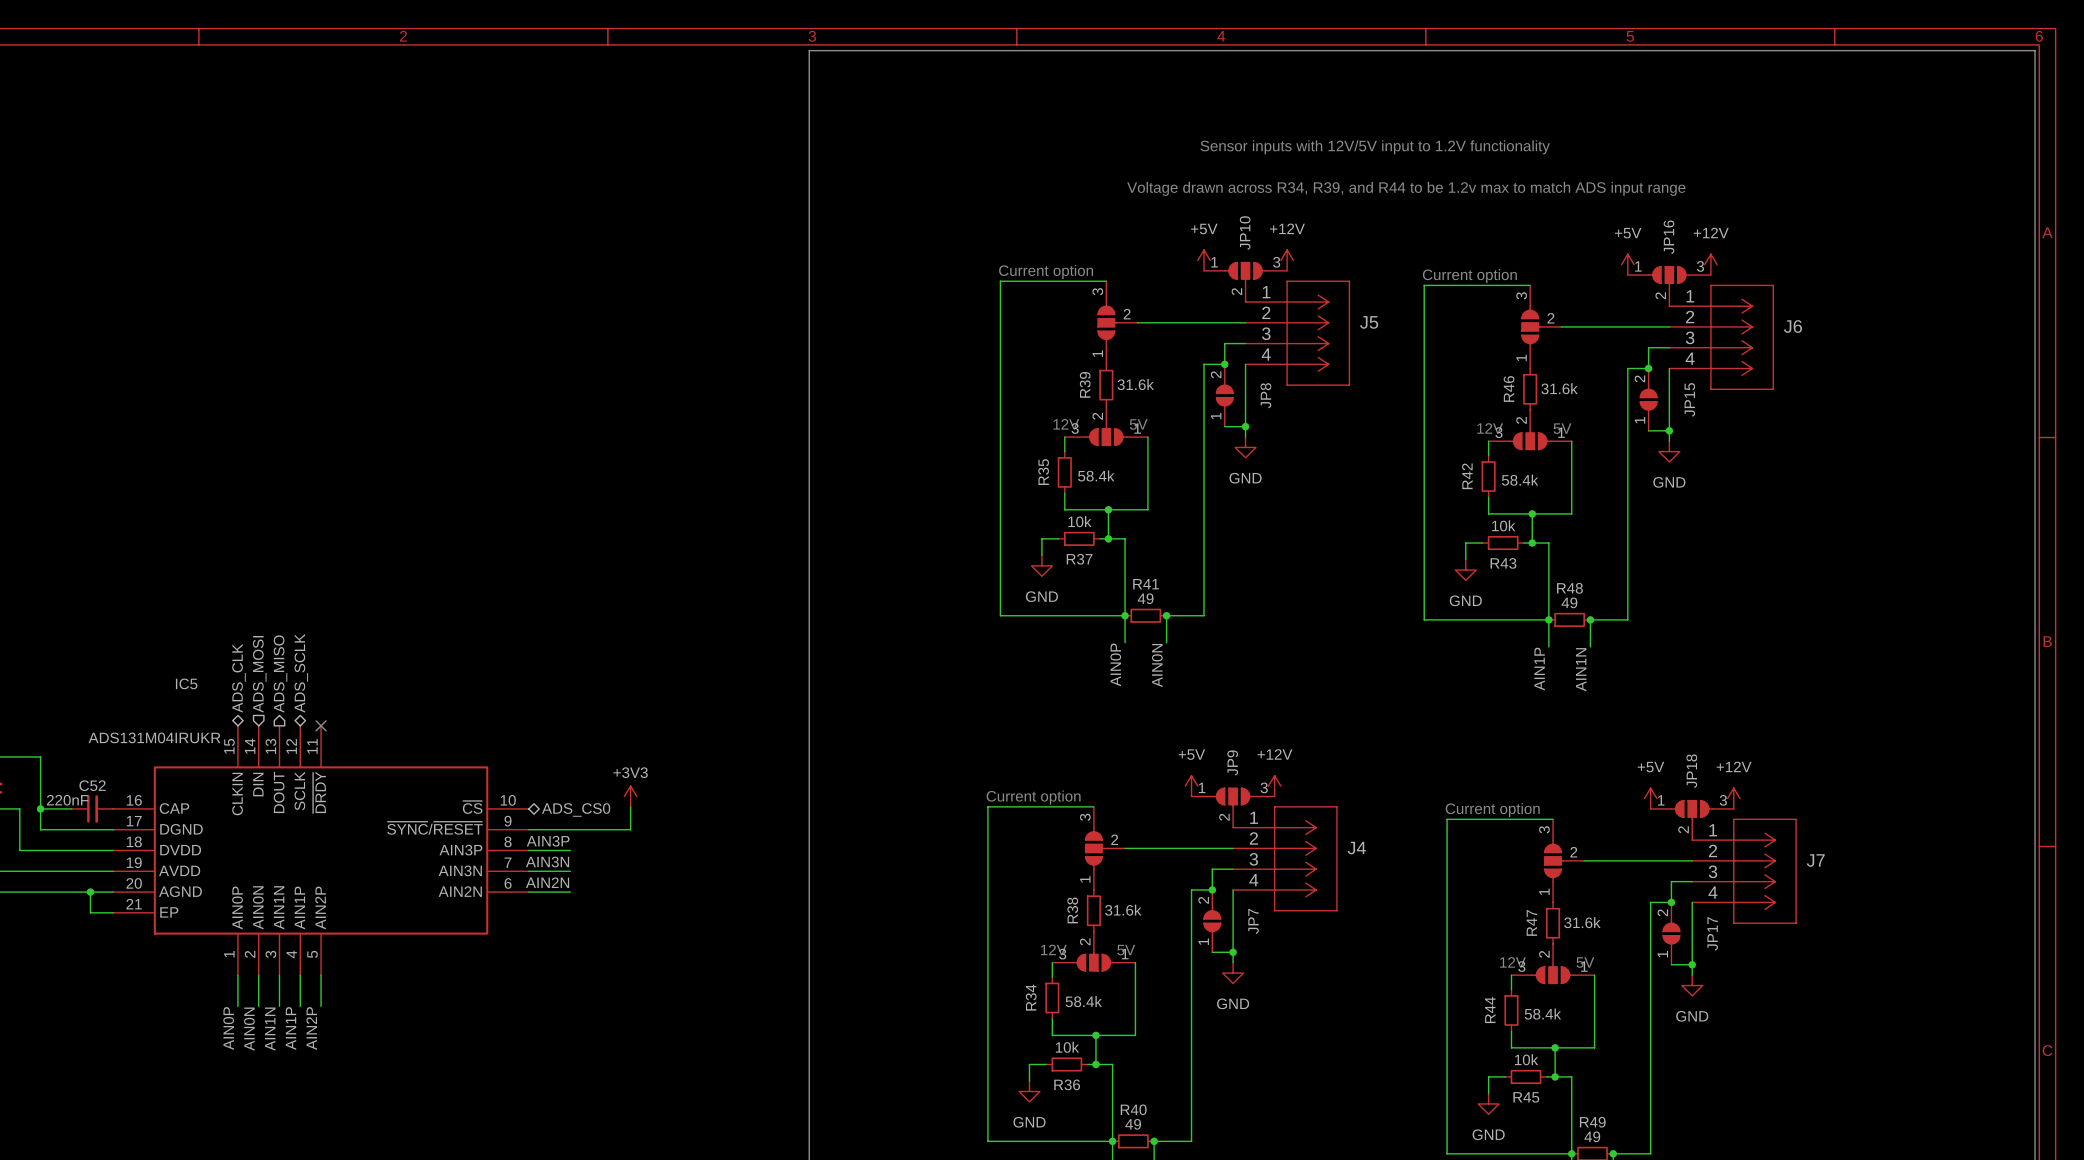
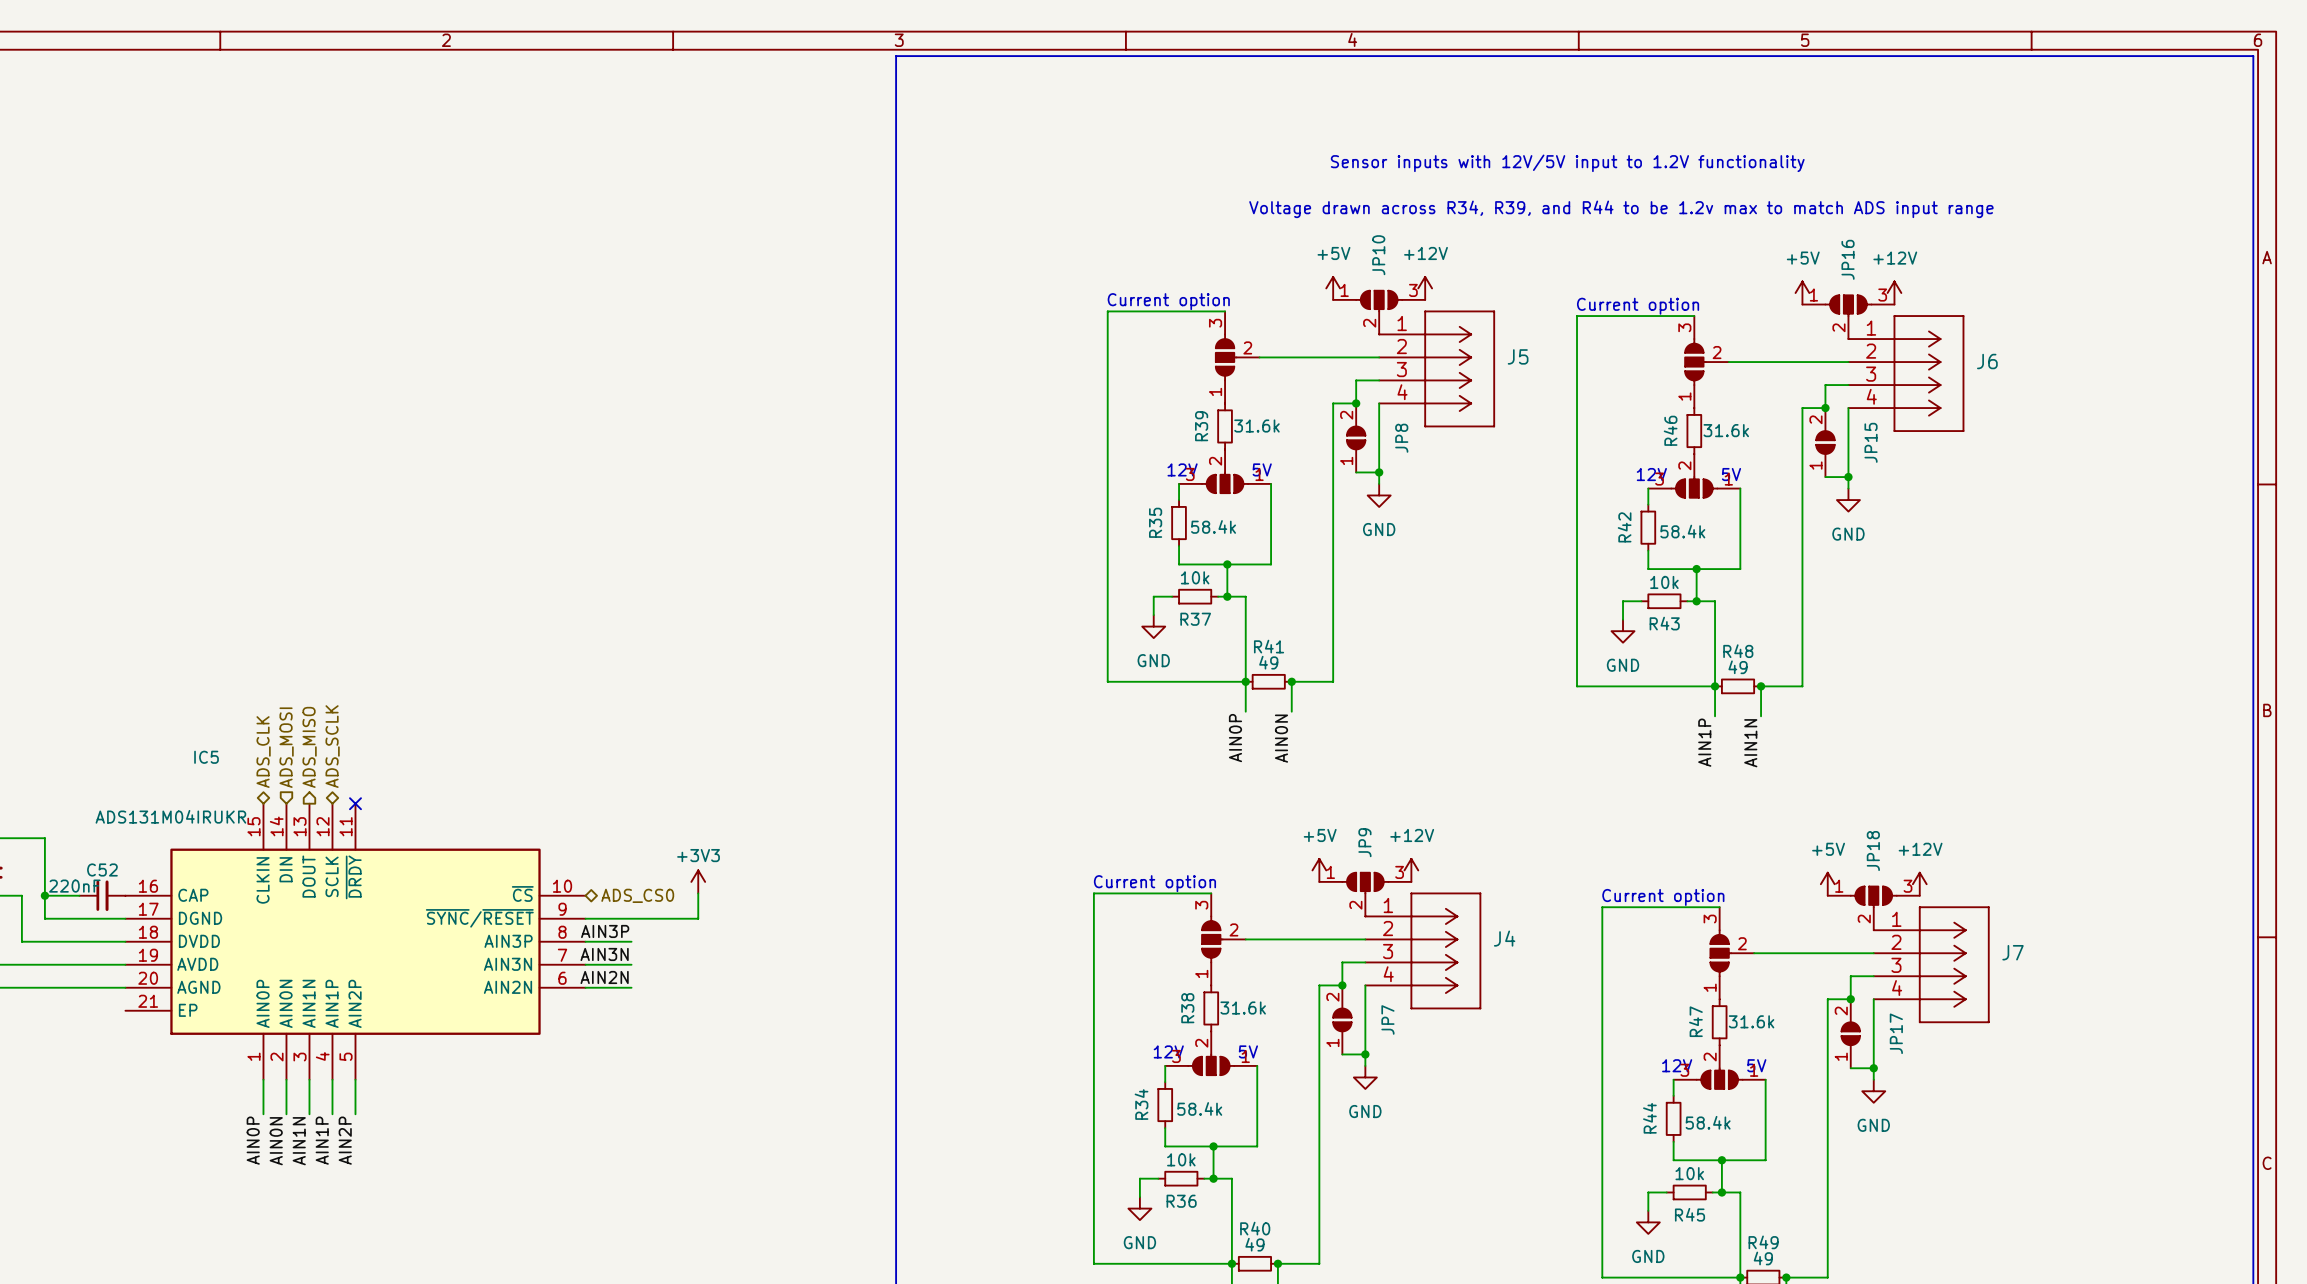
wire: (90, 892) (90, 912) (113, 912) -> none
junction: (90, 892) -> none

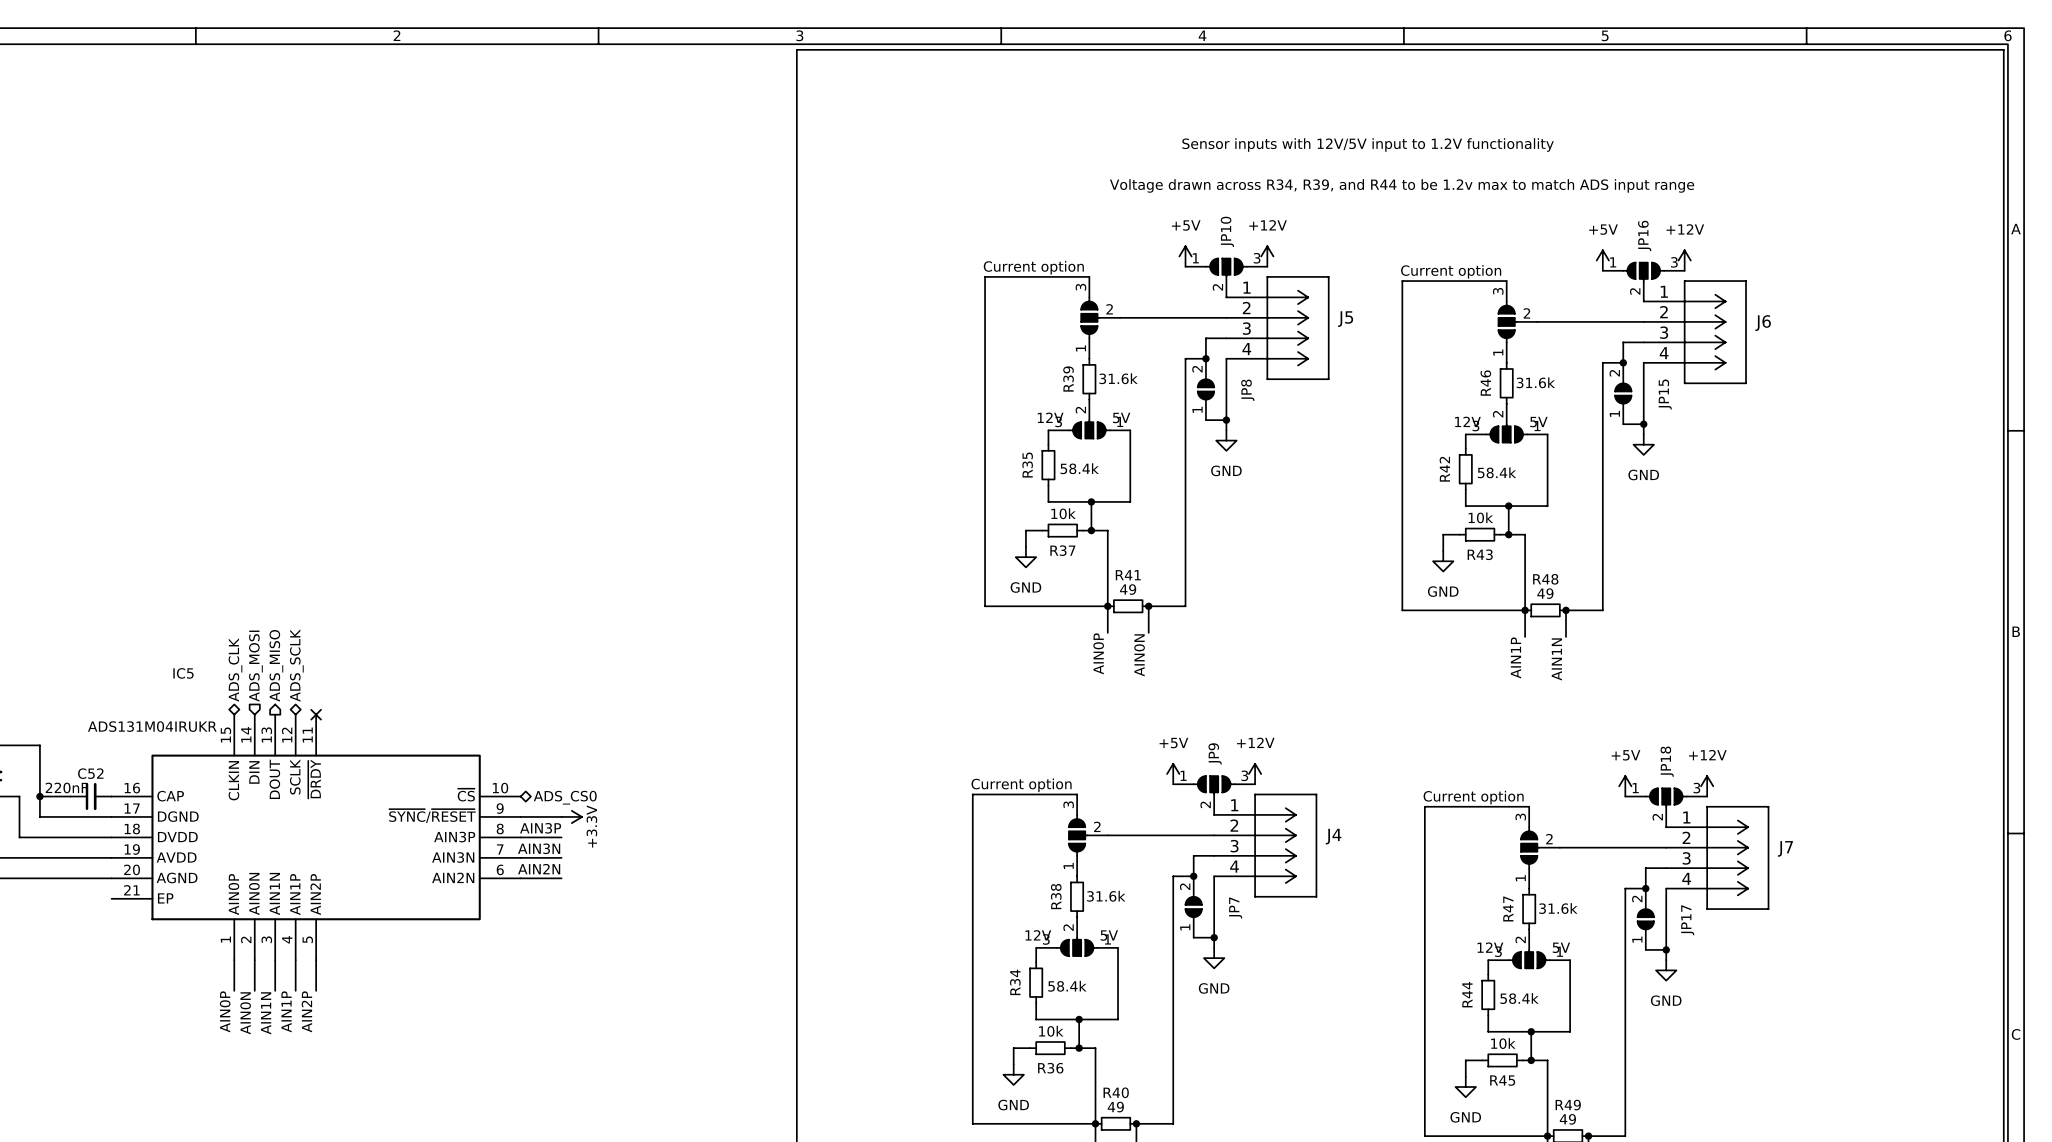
power symbol: +3V3 (698, 881) -> none
wire: (698, 893) (698, 918) (631, 918) -> none
power symbol: none -> +3.3V (571, 816)

